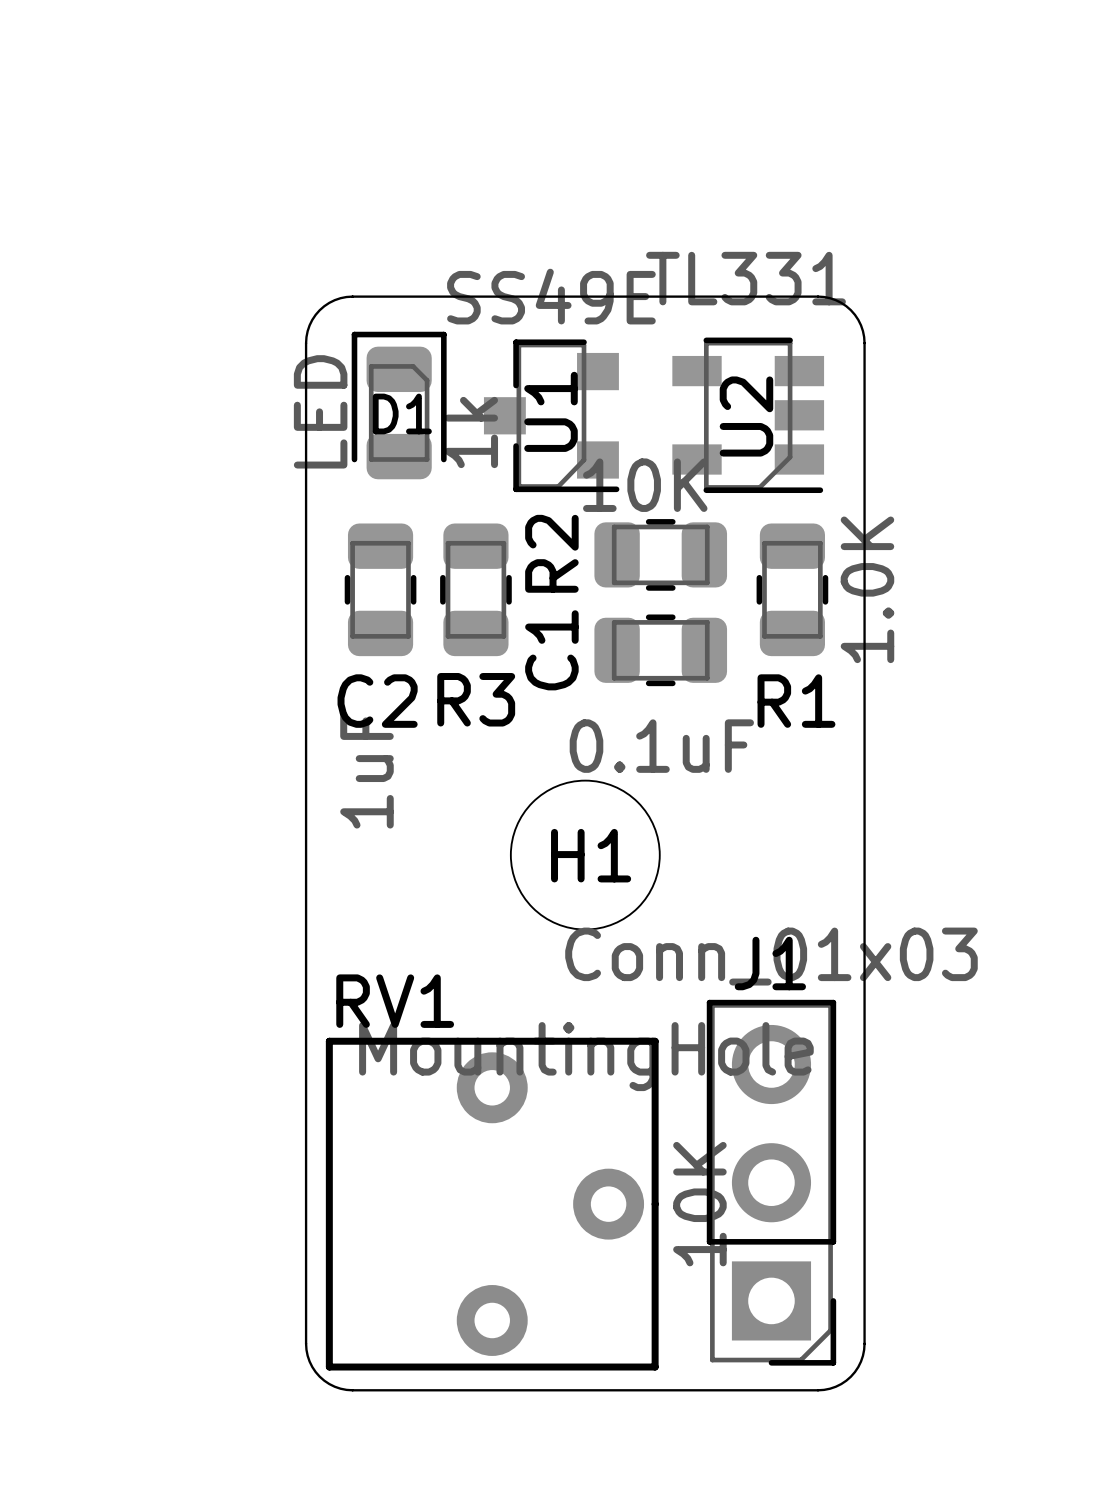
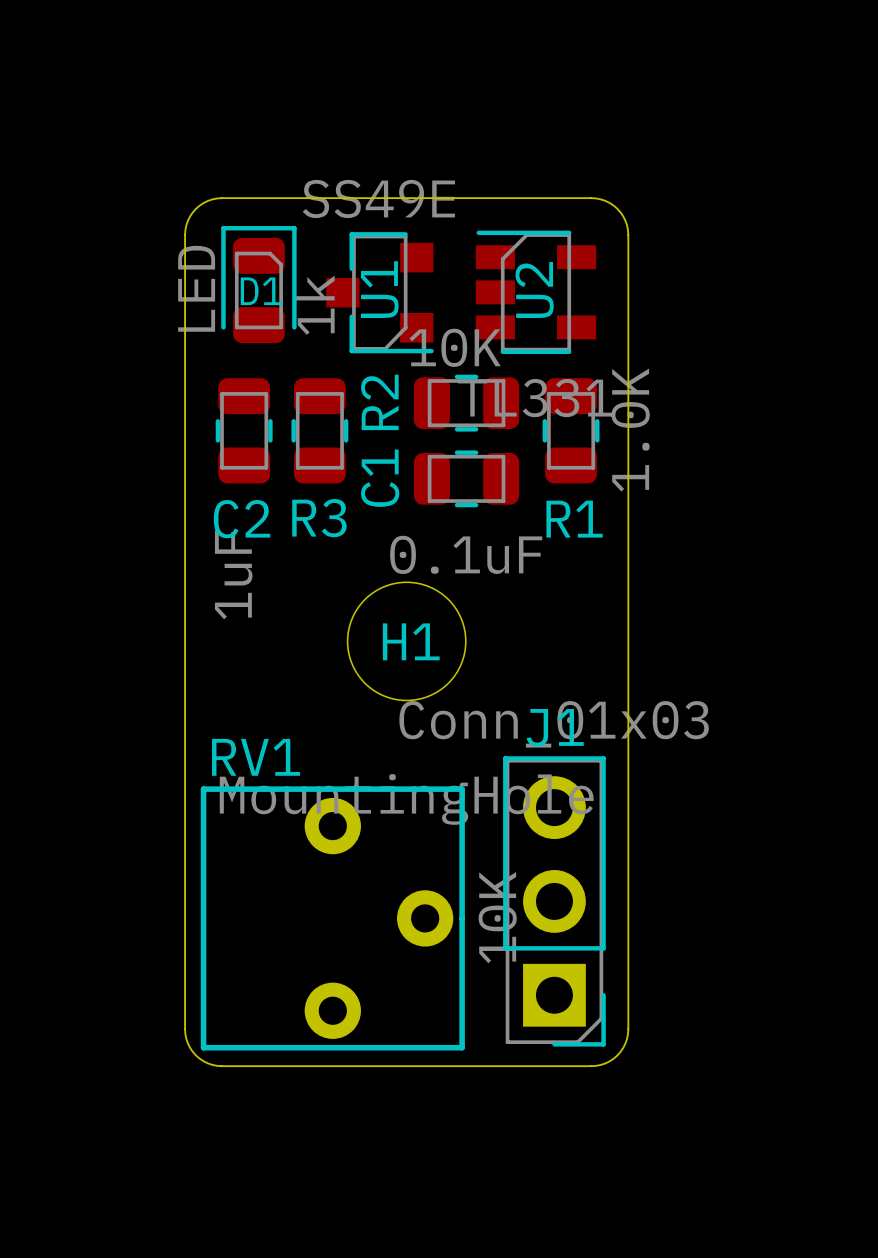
U2 rotation: 0° (748, 415) -> 180° (535, 292)

